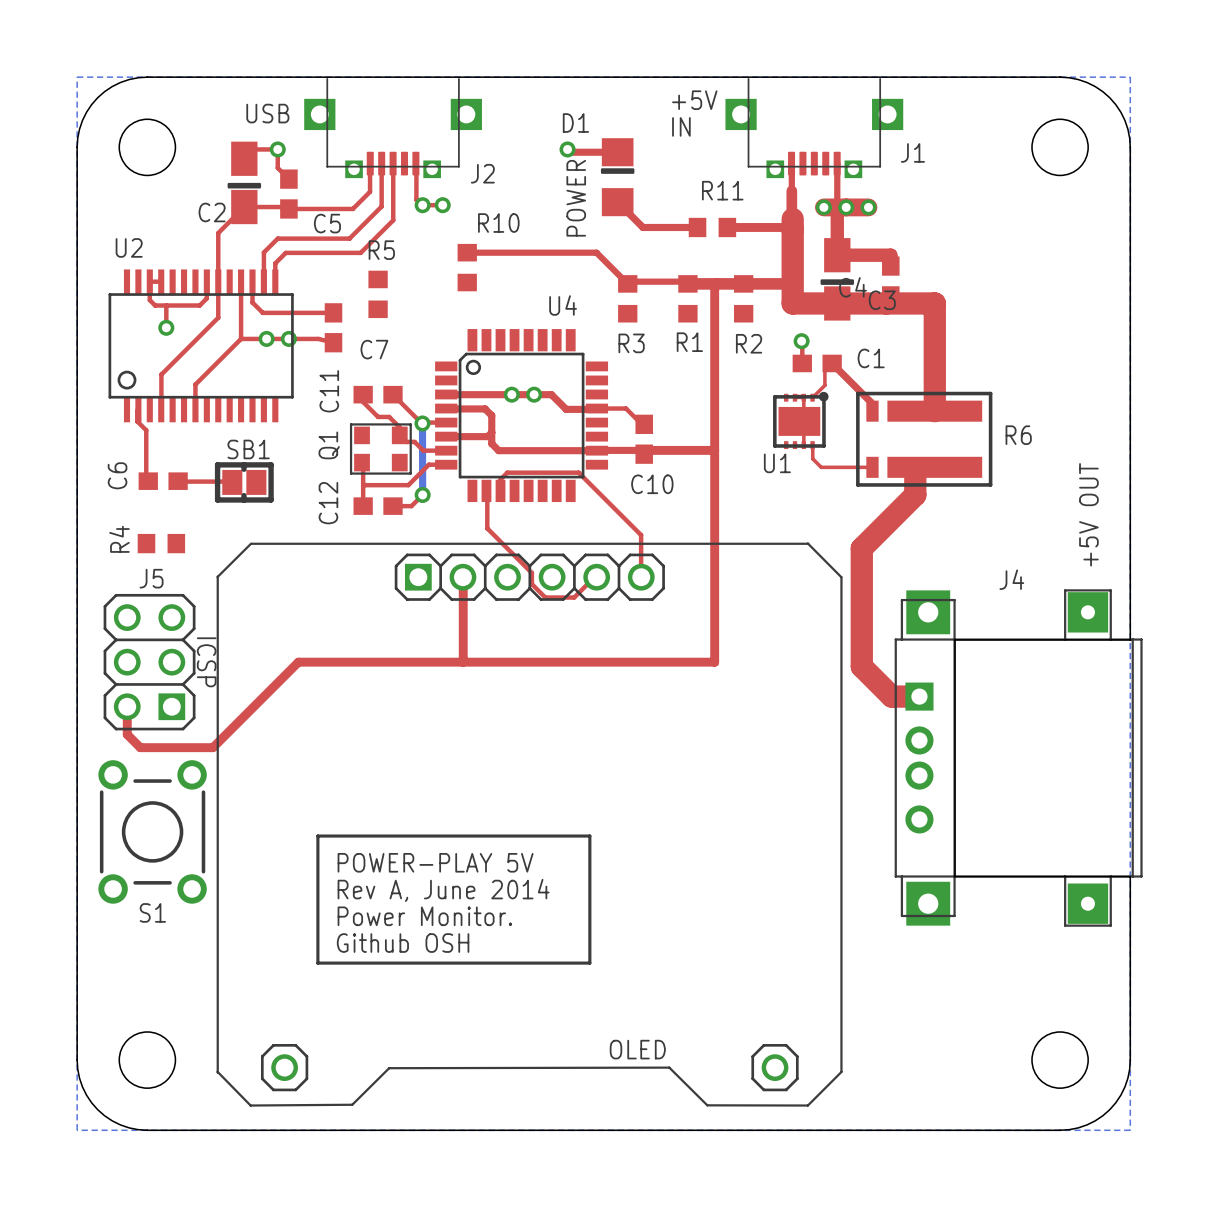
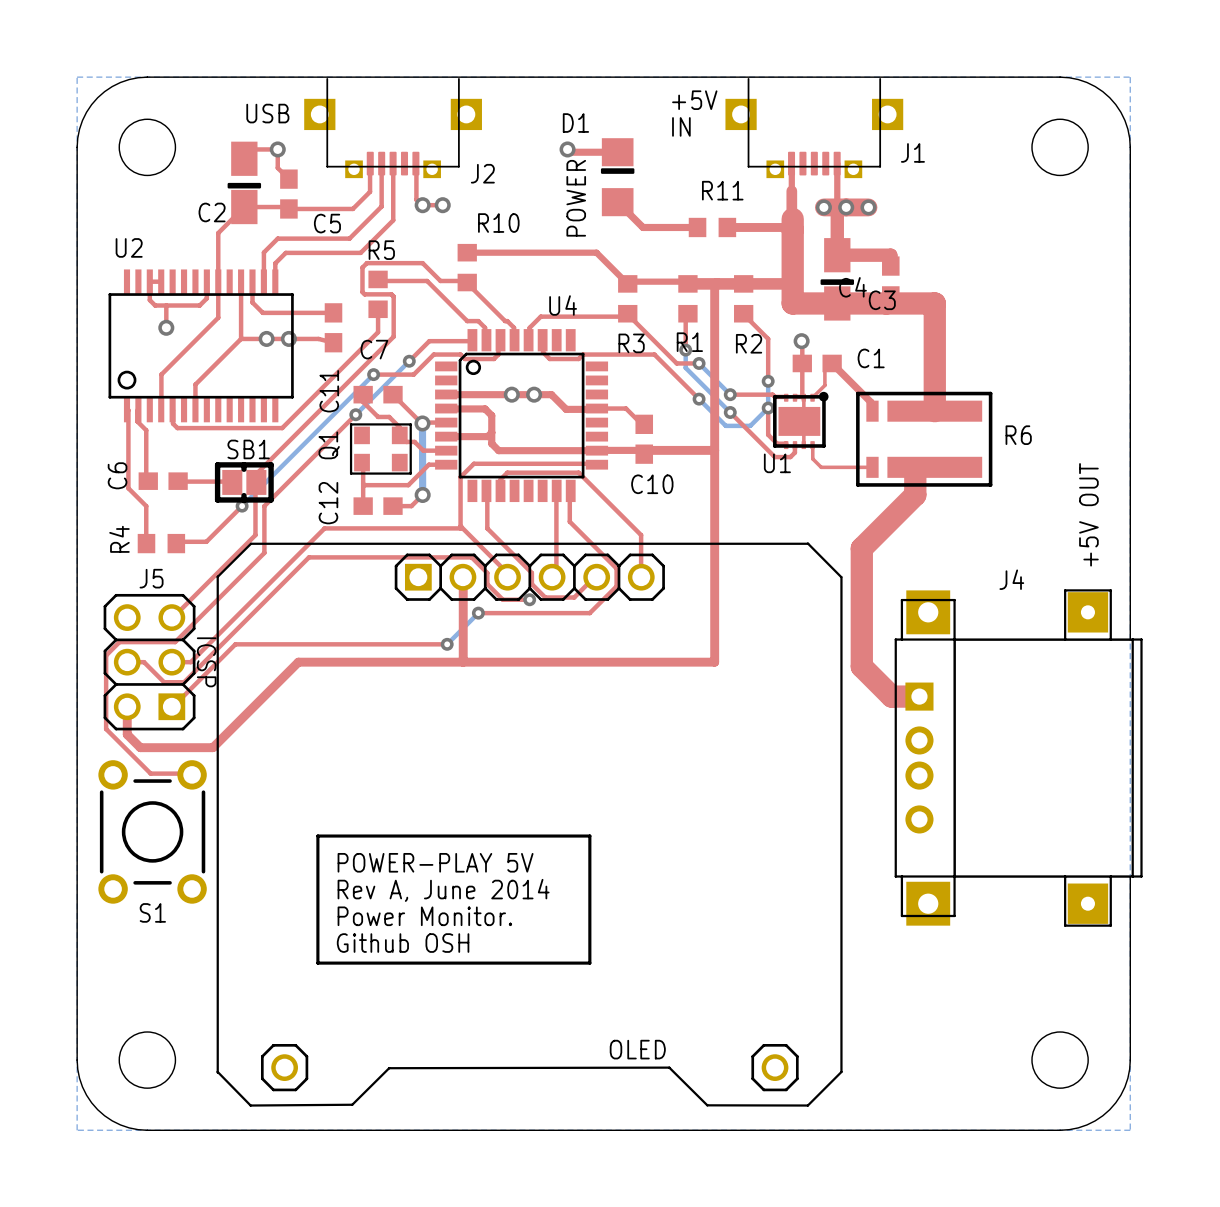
top track: none -> (378, 279) (378, 280) (427, 280) (467, 321) (478, 321) (485, 327) (486, 340)
top track: none -> (378, 309) (378, 332) (282, 428) (177, 428) (173, 423) (172, 410)
top track: none -> (627, 313) (627, 316) (540, 316) (529, 327) (528, 340)
top track: none -> (687, 313) (685, 316) (685, 350)
top track: none -> (743, 313) (768, 338) (768, 381)
top track: none -> (627, 314) (676, 363) (699, 363)
top track: none -> (472, 340) (429, 341) (409, 361)
top track: none -> (500, 340) (498, 341) (498, 354) (493, 359) (465, 359) (460, 354) (433, 354) (413, 374) (373, 374)
top track: none -> (514, 340) (514, 327) (467, 283) (467, 280) (440, 280) (422, 263) (366, 263) (362, 267) (362, 292) (364, 294) (391, 294) (393, 296) (393, 336) (257, 472) (257, 481) (255, 483) (255, 535) (171, 617)
top track: none -> (542, 340) (543, 352) (549, 359) (578, 359) (583, 354) (654, 354) (699, 399)
bottom track: none -> (685, 350) (685, 367) (730, 412)
via: none -> (685, 350)
bottom track: none -> (409, 361) (355, 414)
via: none -> (409, 361)
bottom track: none -> (699, 363) (730, 394)
via: none -> (699, 363)
top track: none -> (802, 363) (801, 396)
bottom track: none -> (373, 374) (242, 506)
via: none -> (373, 374)
bottom track: none -> (768, 381) (768, 408) (750, 425) (725, 425) (699, 399)
via: none -> (768, 381)
top track: none -> (730, 394) (772, 394) (774, 396) (786, 396)
via: none -> (730, 394)
via: none -> (699, 399)
top track: none -> (768, 408) (768, 434) (777, 443) (786, 445)
via: none -> (768, 408)
top track: none -> (126, 410) (128, 488) (146, 506) (146, 543)
top track: none -> (730, 412) (774, 457) (790, 457) (794, 452) (795, 445)
via: none -> (730, 412)
top track: none -> (355, 414) (264, 506) (264, 552) (175, 642) (119, 642) (106, 655) (106, 729) (150, 773) (192, 774)
via: none -> (355, 414)
top track: none -> (596, 464) (473, 463) (460, 477) (460, 526) (507, 573) (507, 577)
top track: none -> (556, 490) (556, 573) (552, 577)
top track: none -> (570, 490) (569, 521) (616, 568) (616, 586) (589, 613) (478, 613)
top track: none -> (242, 506) (206, 541) (177, 541) (176, 543)
via: none -> (242, 506)
top track: none -> (461, 527) (324, 528) (190, 662) (171, 662)
top track: none -> (529, 599) (502, 599) (487, 584) (487, 573) (471, 557) (308, 557) (184, 682) (164, 682) (144, 662) (127, 662)
via: none -> (529, 599)
bottom track: none -> (478, 613) (447, 644)
via: none -> (478, 613)
top track: none -> (447, 644) (235, 644) (171, 706)
via: none -> (447, 644)

